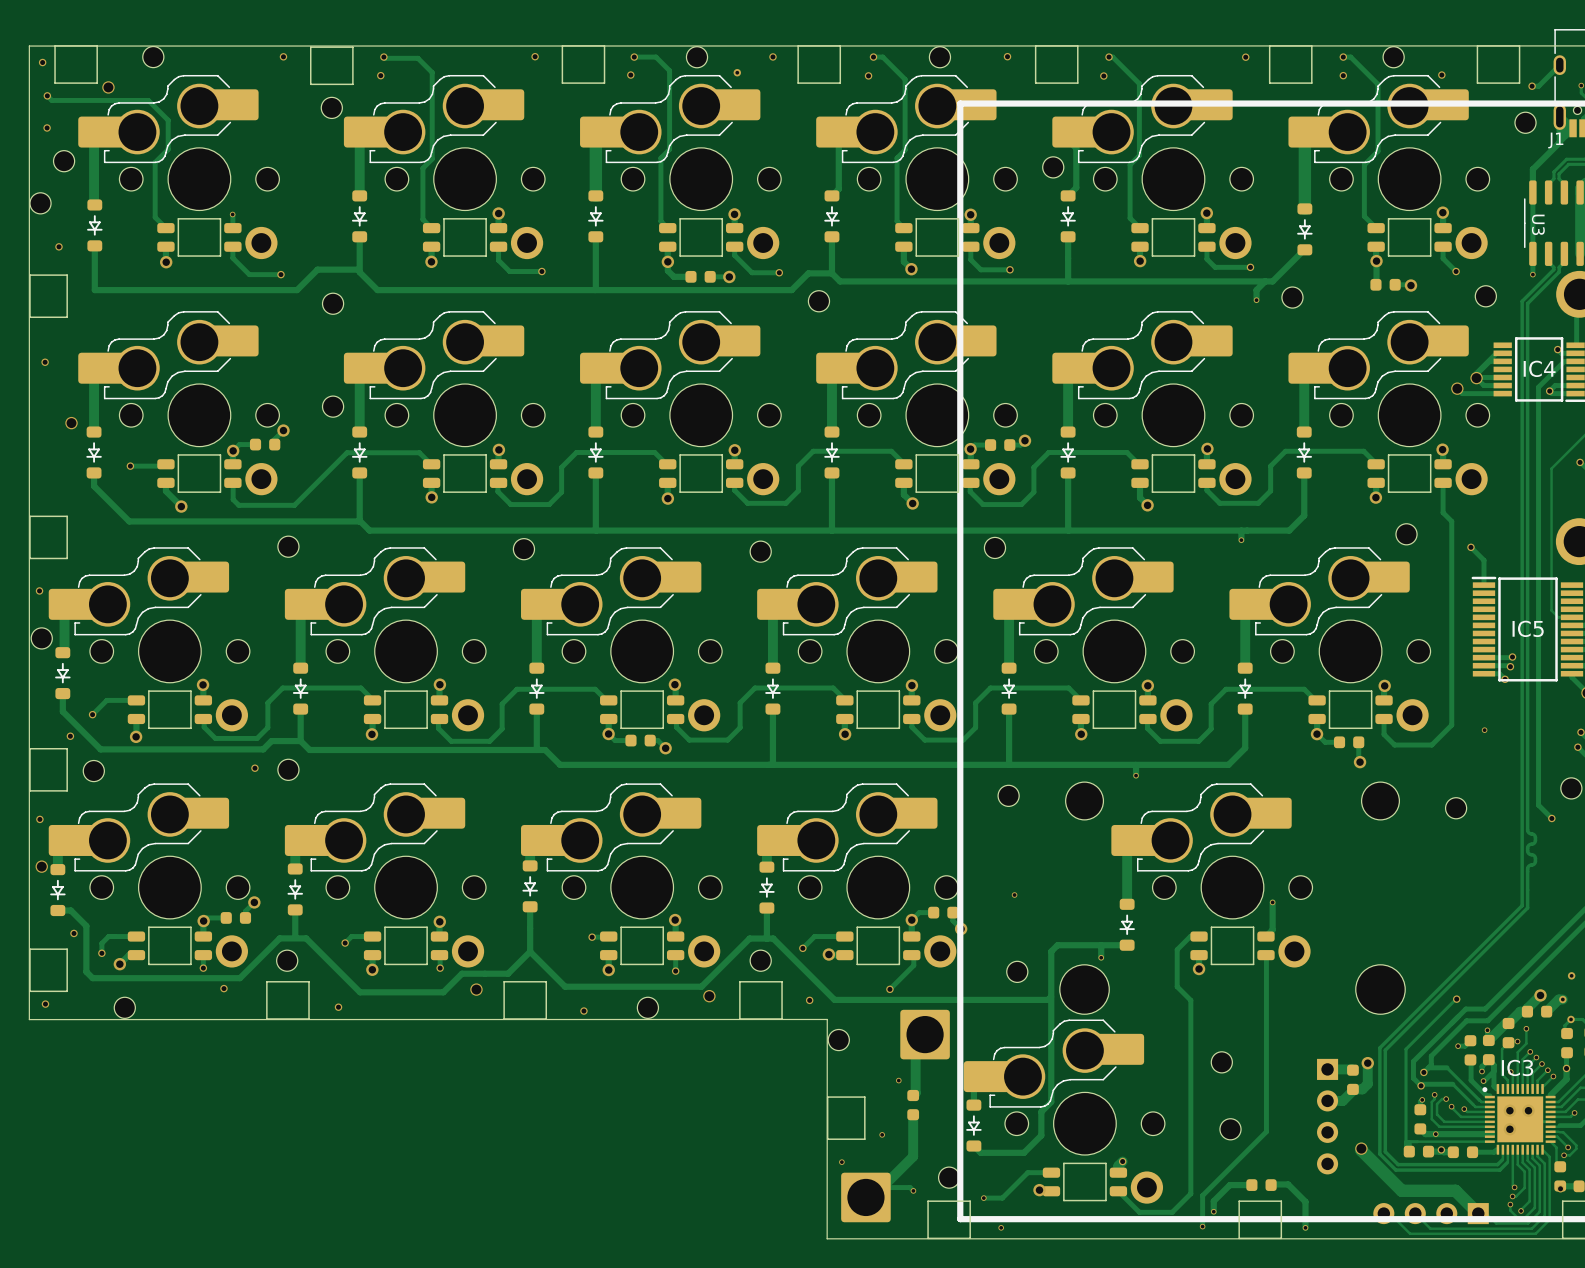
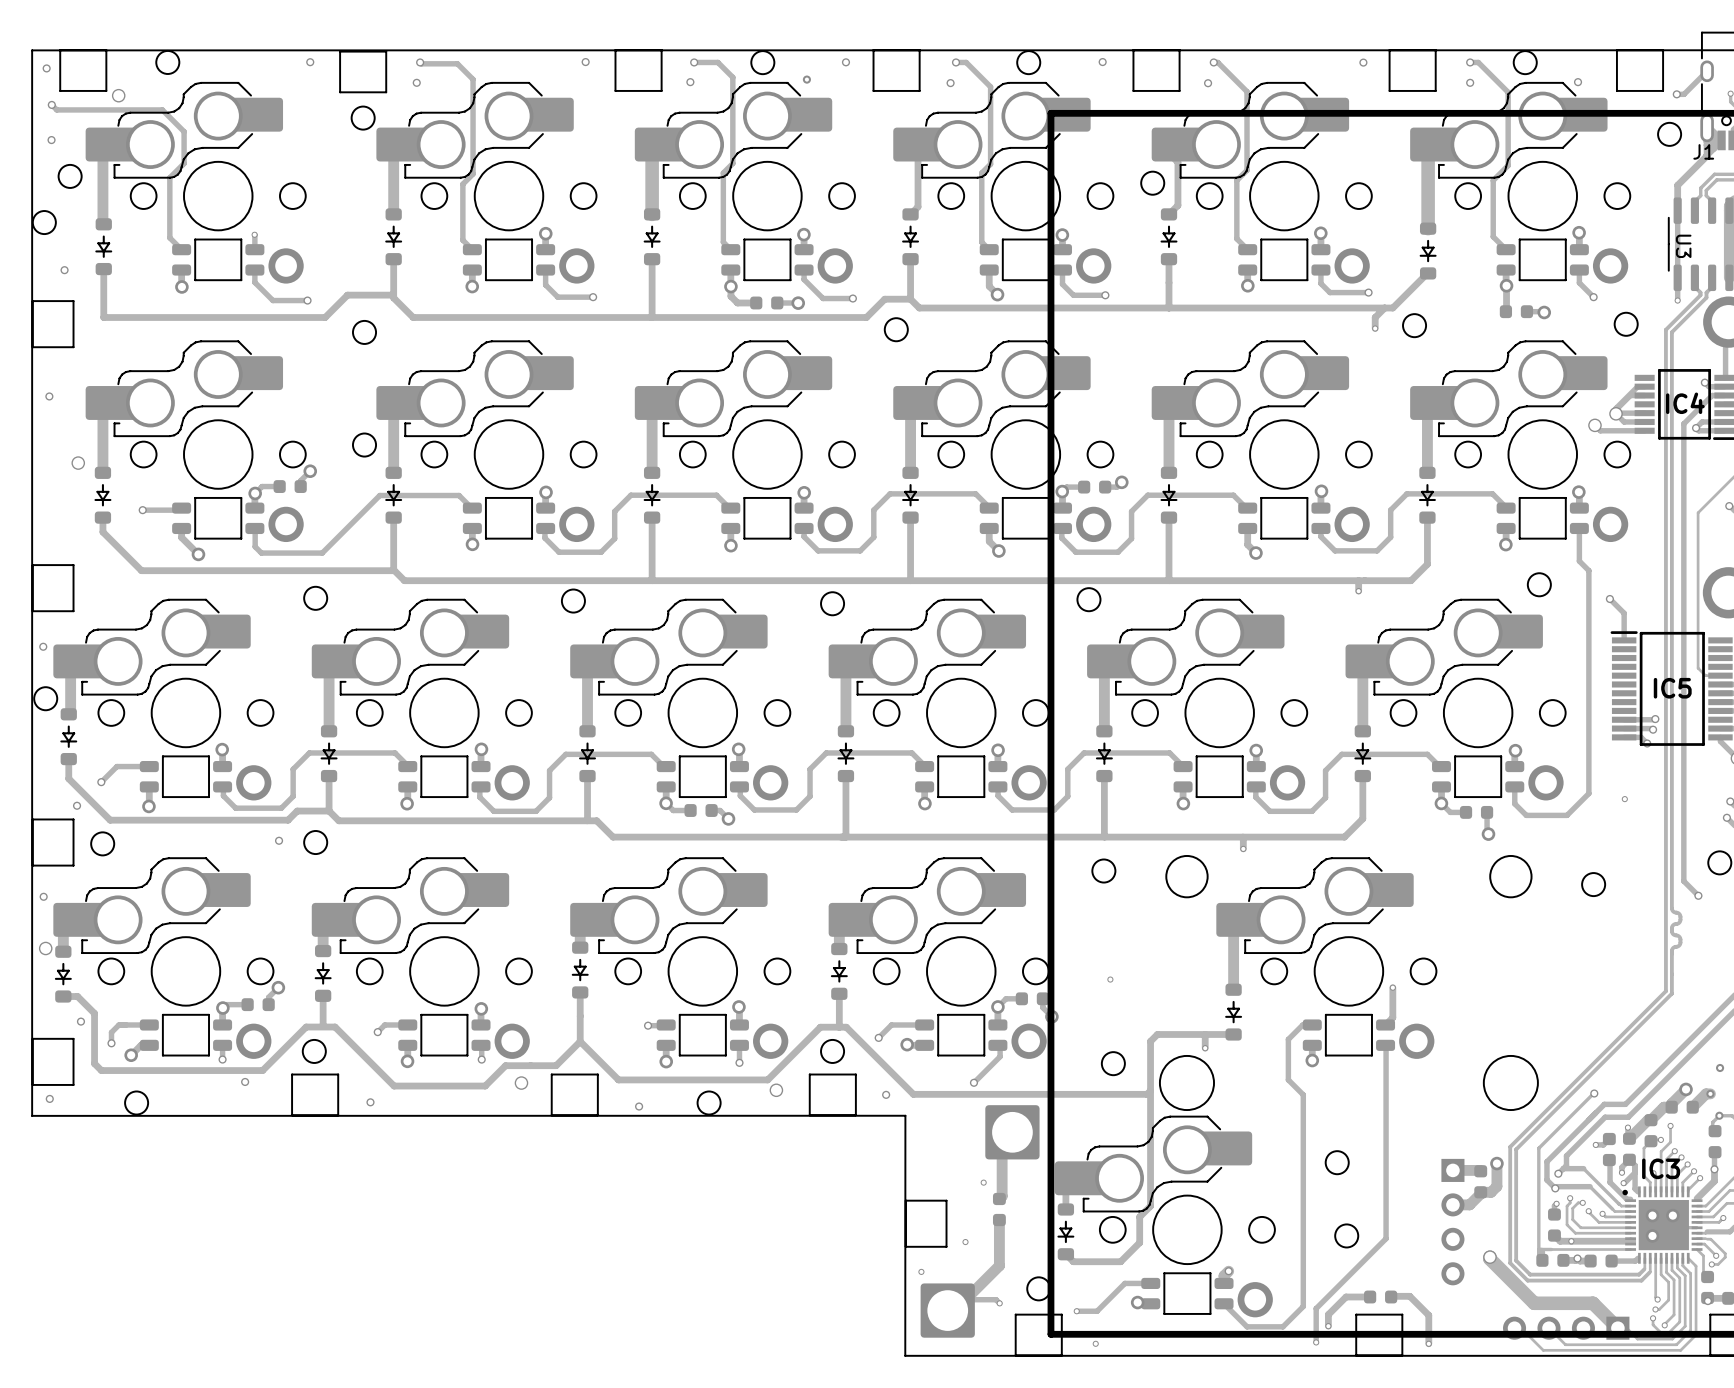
part: (838, 1040) -> none

